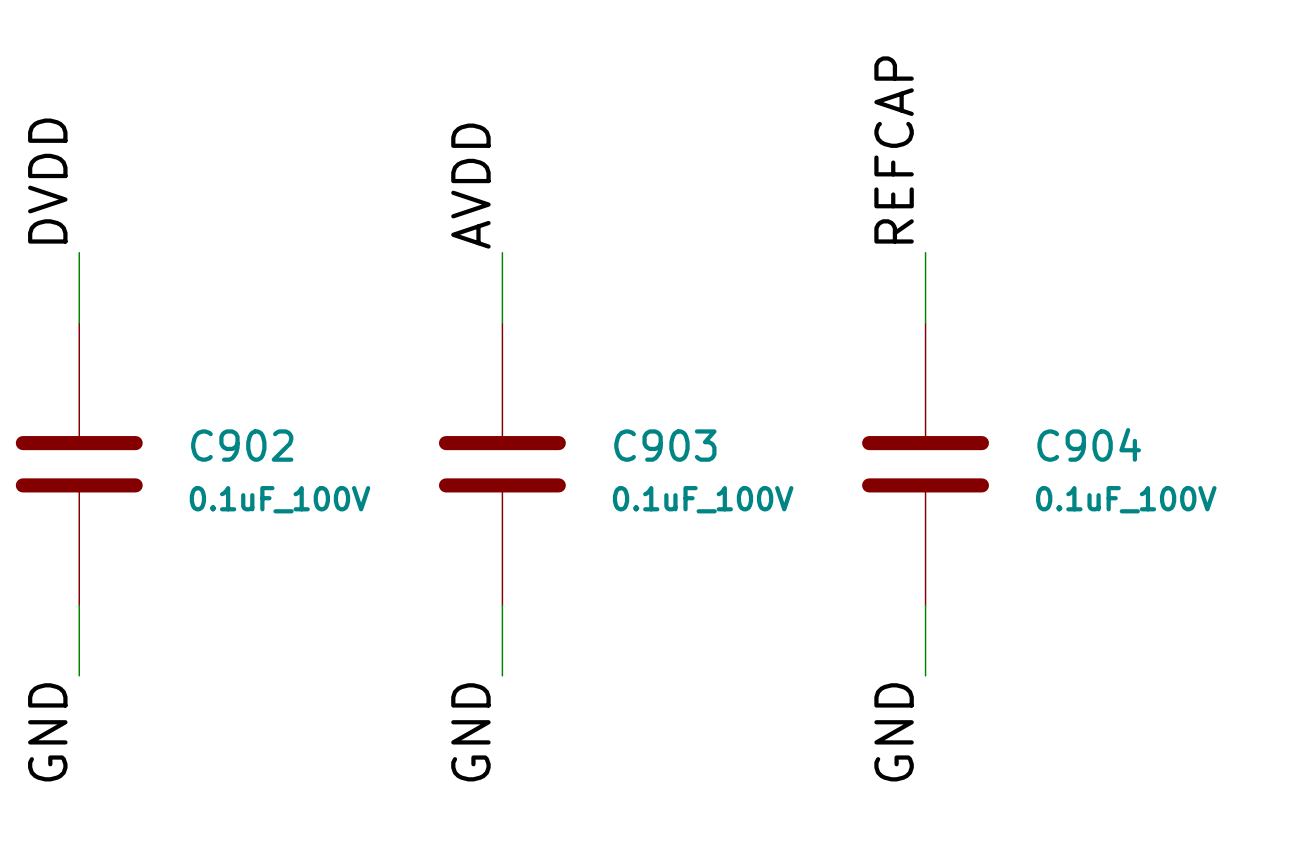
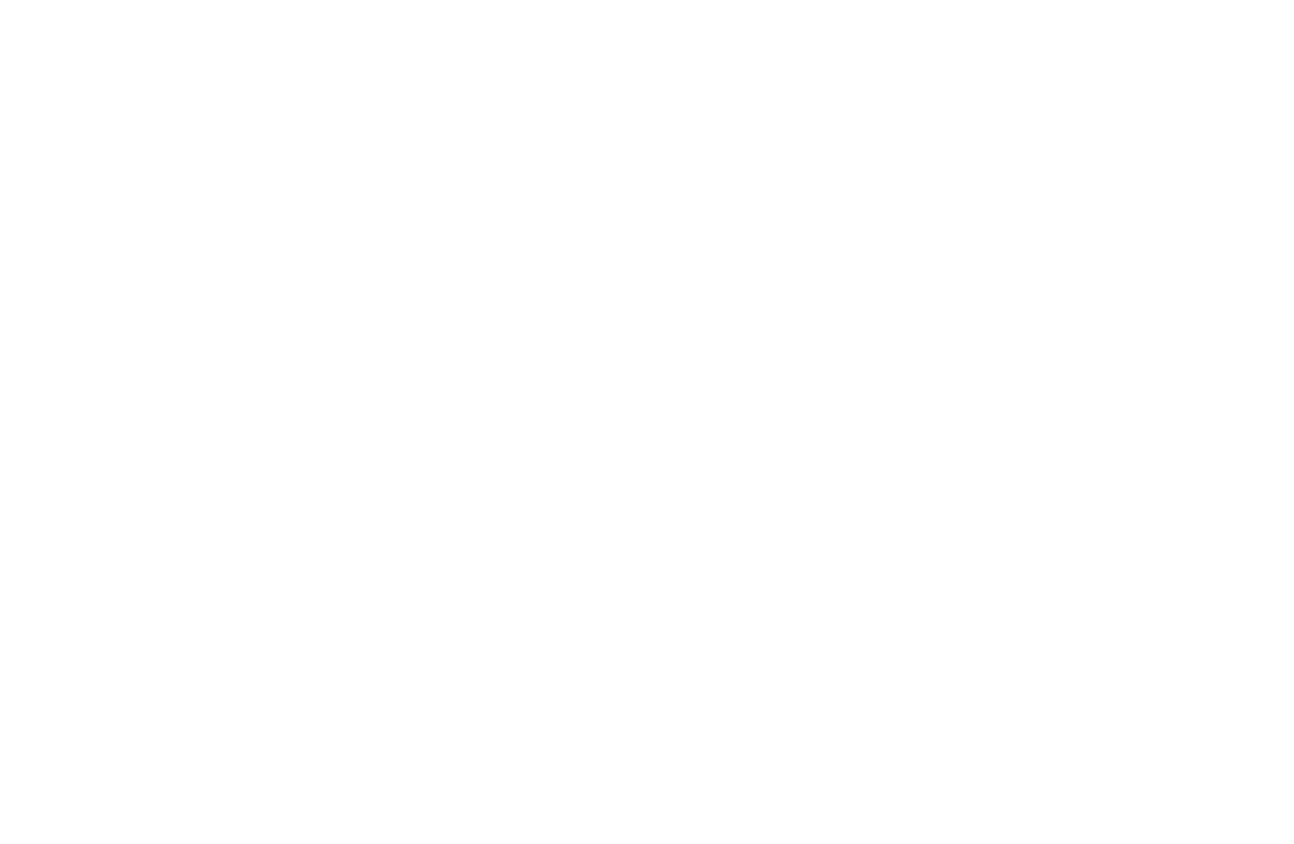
label: REFCAP (894, 149) -> none
label: DVDD (47, 181) -> none
label: AVDD (470, 186) -> none
wire: (79, 252) (79, 323) -> none
wire: (502, 252) (502, 323) -> none
wire: (925, 252) (925, 323) -> none
C902: 0.1uF_100V (79, 464) -> none
C903: 0.1uF_100V (502, 464) -> none
C904: 0.1uF_100V (925, 464) -> none
wire: (79, 605) (79, 675) -> none
wire: (502, 605) (502, 675) -> none
wire: (925, 605) (925, 675) -> none
label: GND (47, 732) -> none
label: GND (470, 732) -> none
label: GND (894, 732) -> none

